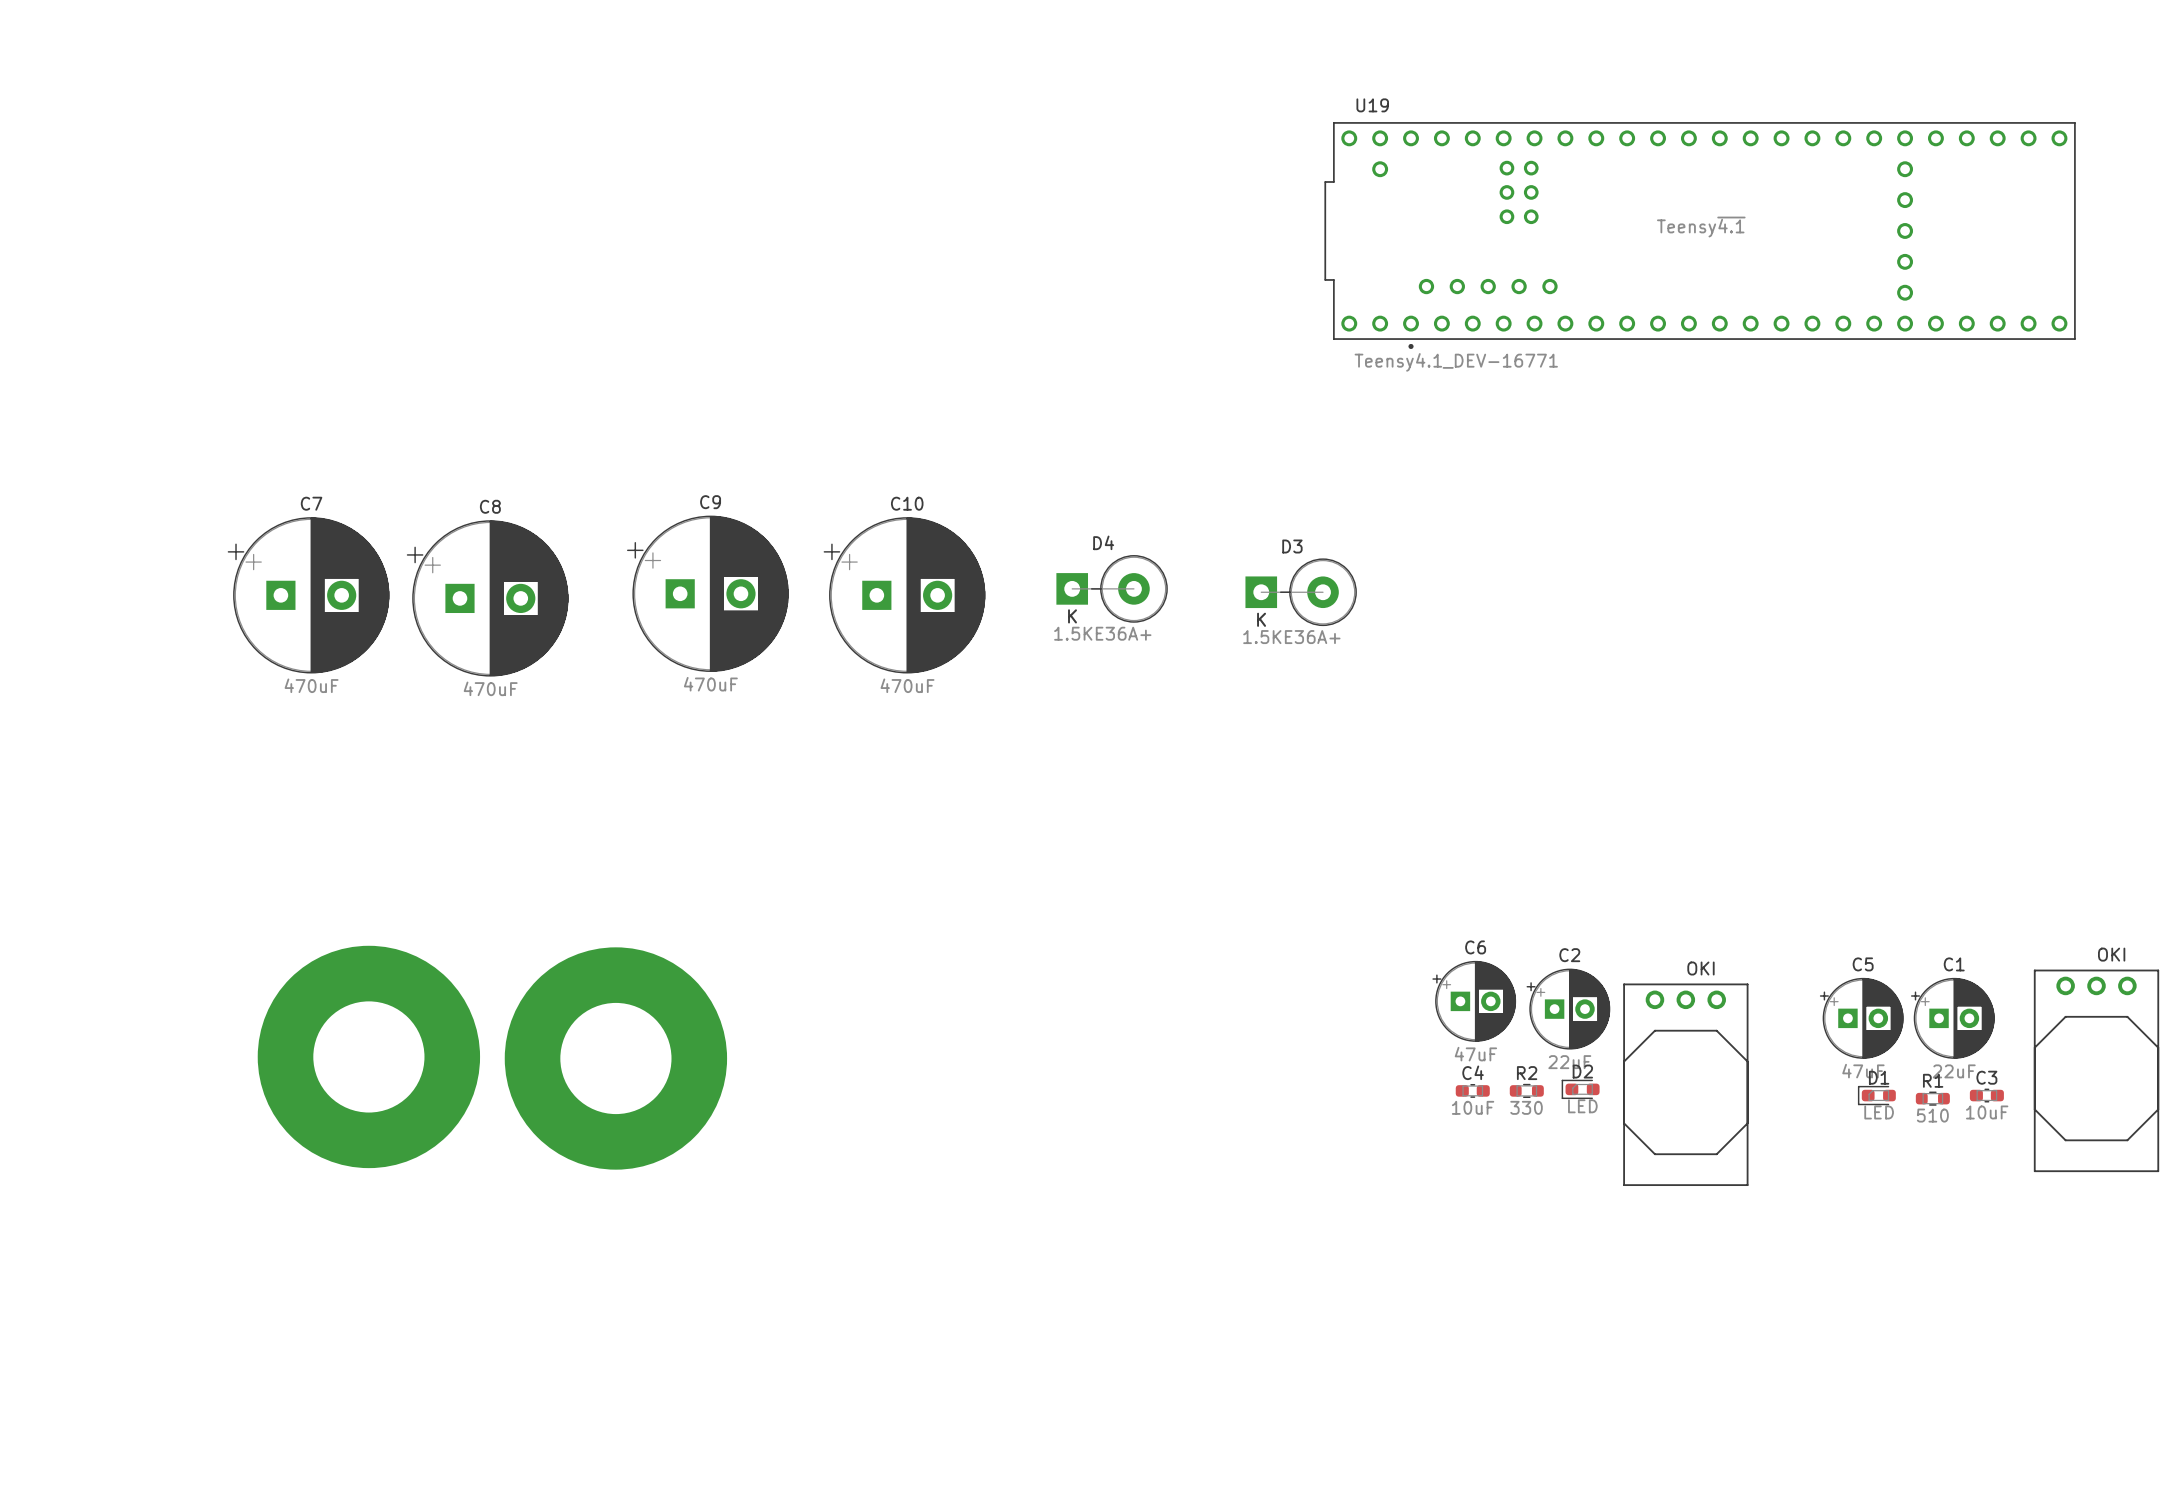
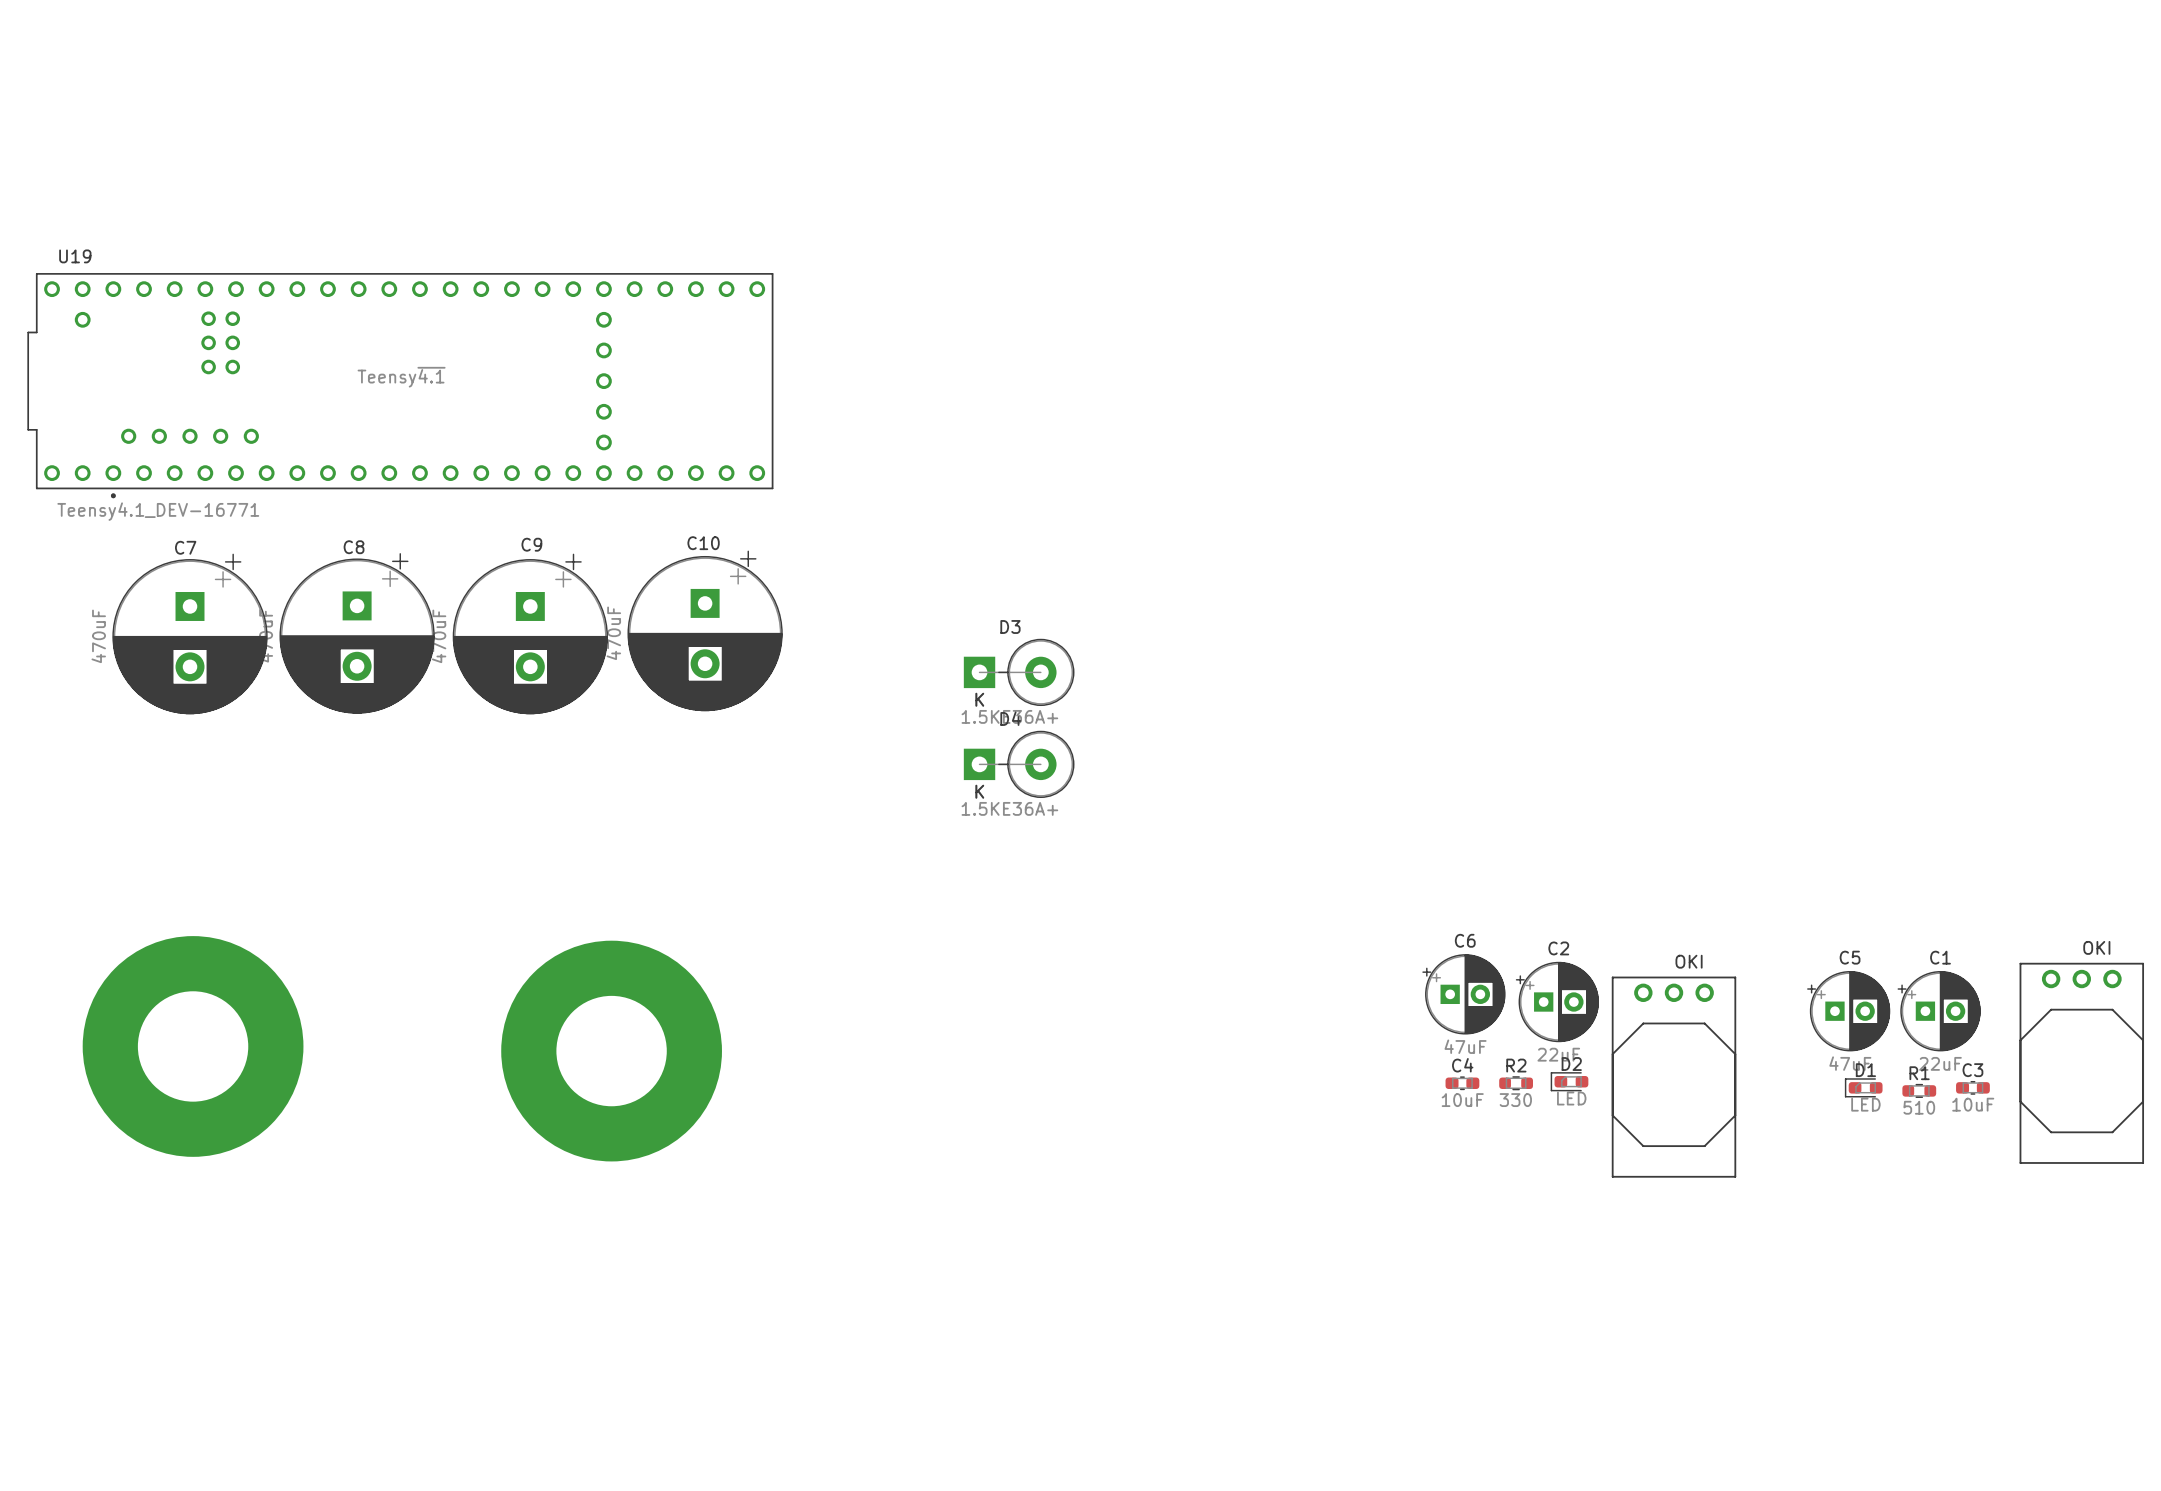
U19 position: (1700, 235) -> (400, 385)
D4 position: (1112, 588) -> (1019, 764)
D3 position: (1301, 592) -> (1019, 672)
C9 rotation: 0° (707, 593) -> 90° clockwise (530, 633)
C9 position: (707, 593) -> (530, 633)
C7 rotation: 0° (308, 595) -> 90° clockwise (190, 633)
C7 position: (308, 595) -> (190, 633)
C10 rotation: 0° (904, 595) -> 90° clockwise (705, 630)
C10 position: (904, 595) -> (705, 630)
C8 rotation: 0° (487, 598) -> 90° clockwise (357, 633)
C8 position: (487, 598) -> (357, 633)
part position: (368, 1056) -> (193, 1046)

